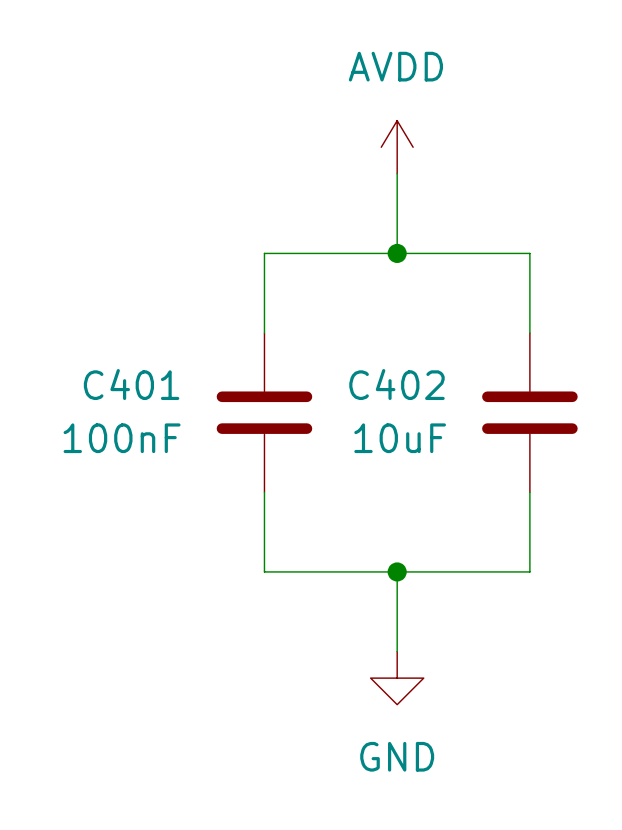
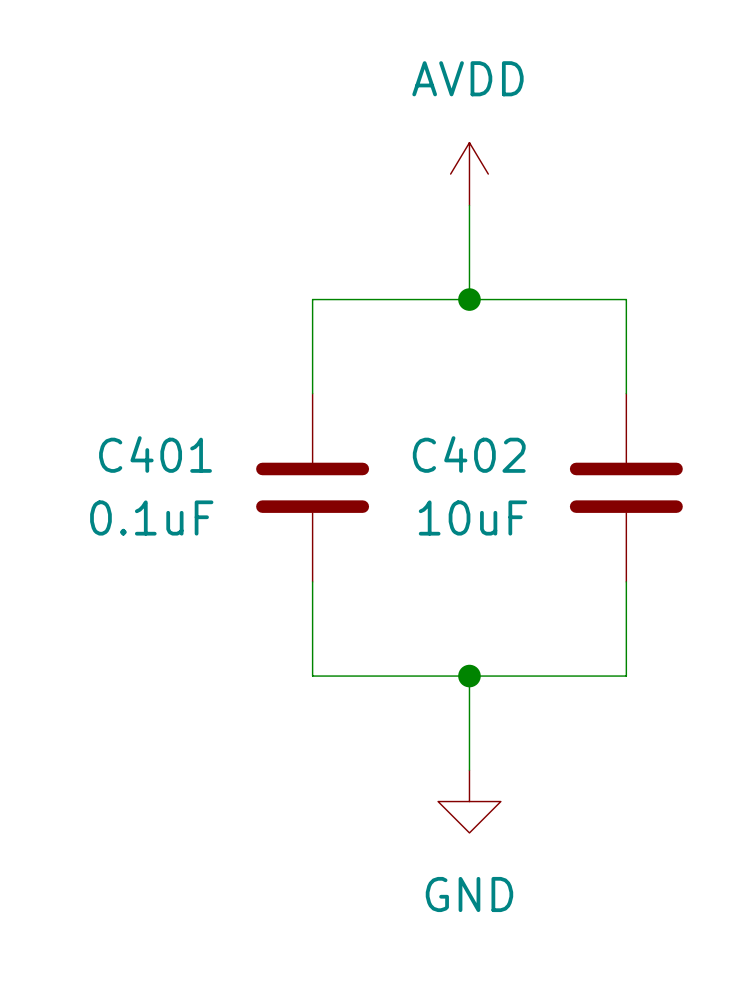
C401 value: 100nF (122, 438) -> 0.1uF (151, 518)

